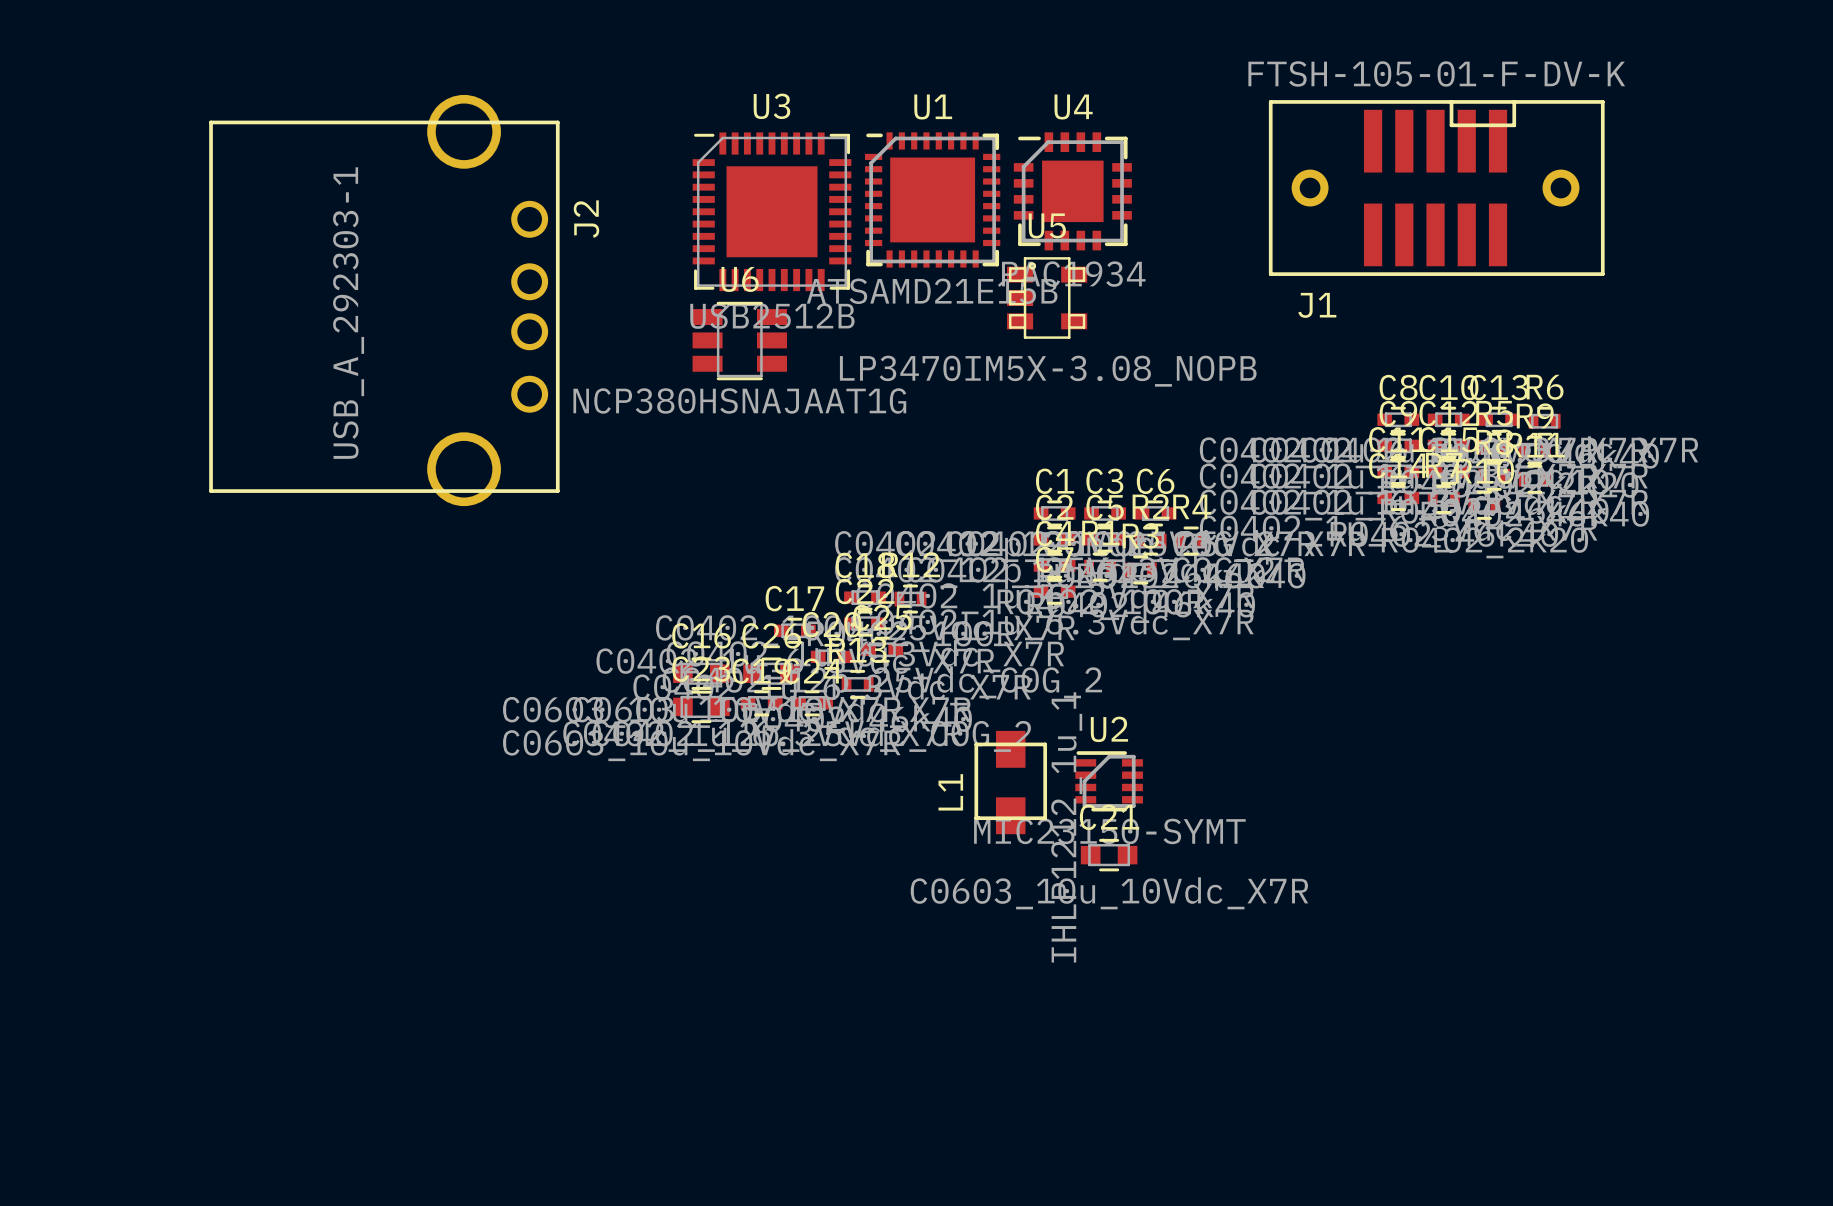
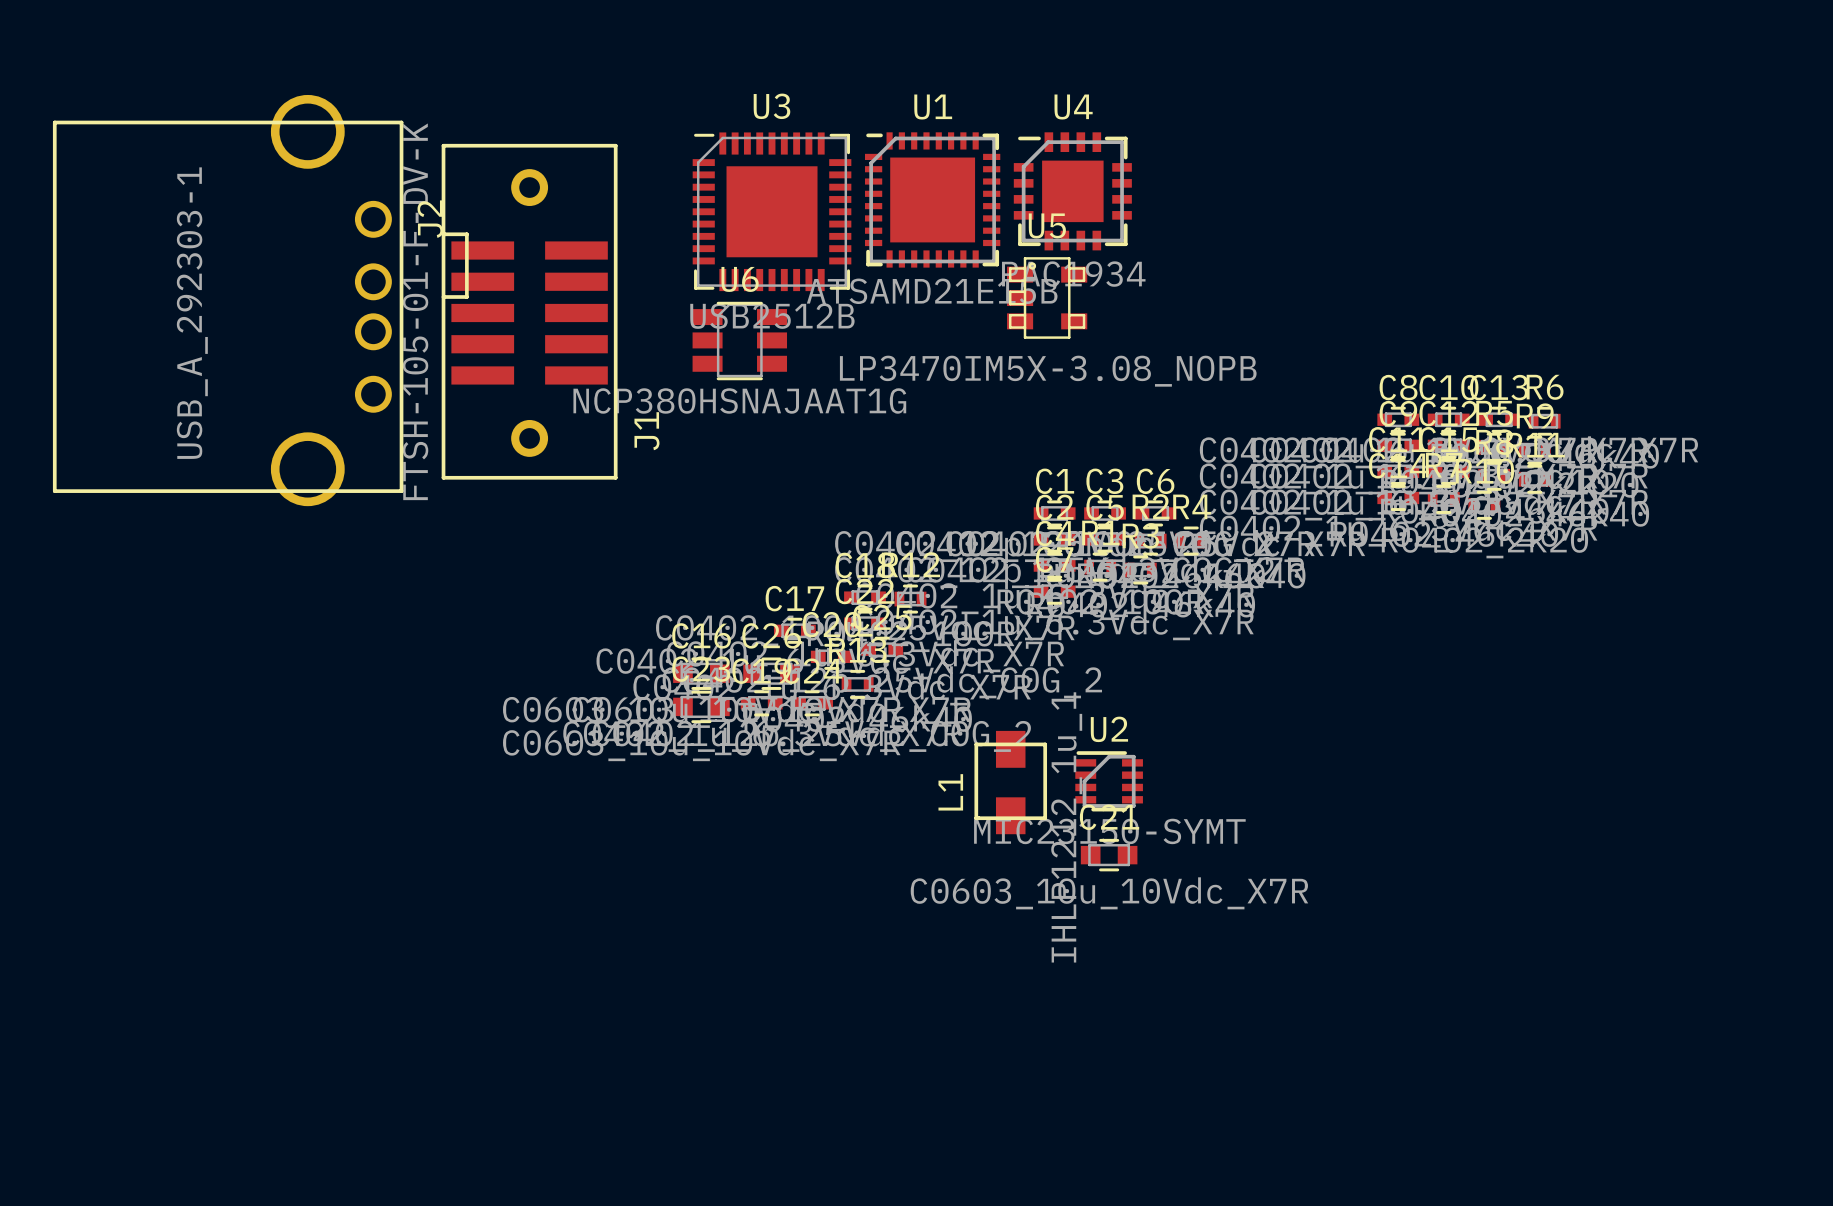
J1 rotation: 0° (1436, 188) -> 90° counterclockwise (529, 311)
J1 position: (1436, 188) -> (529, 311)
J2 position: (384, 300) -> (228, 300)

